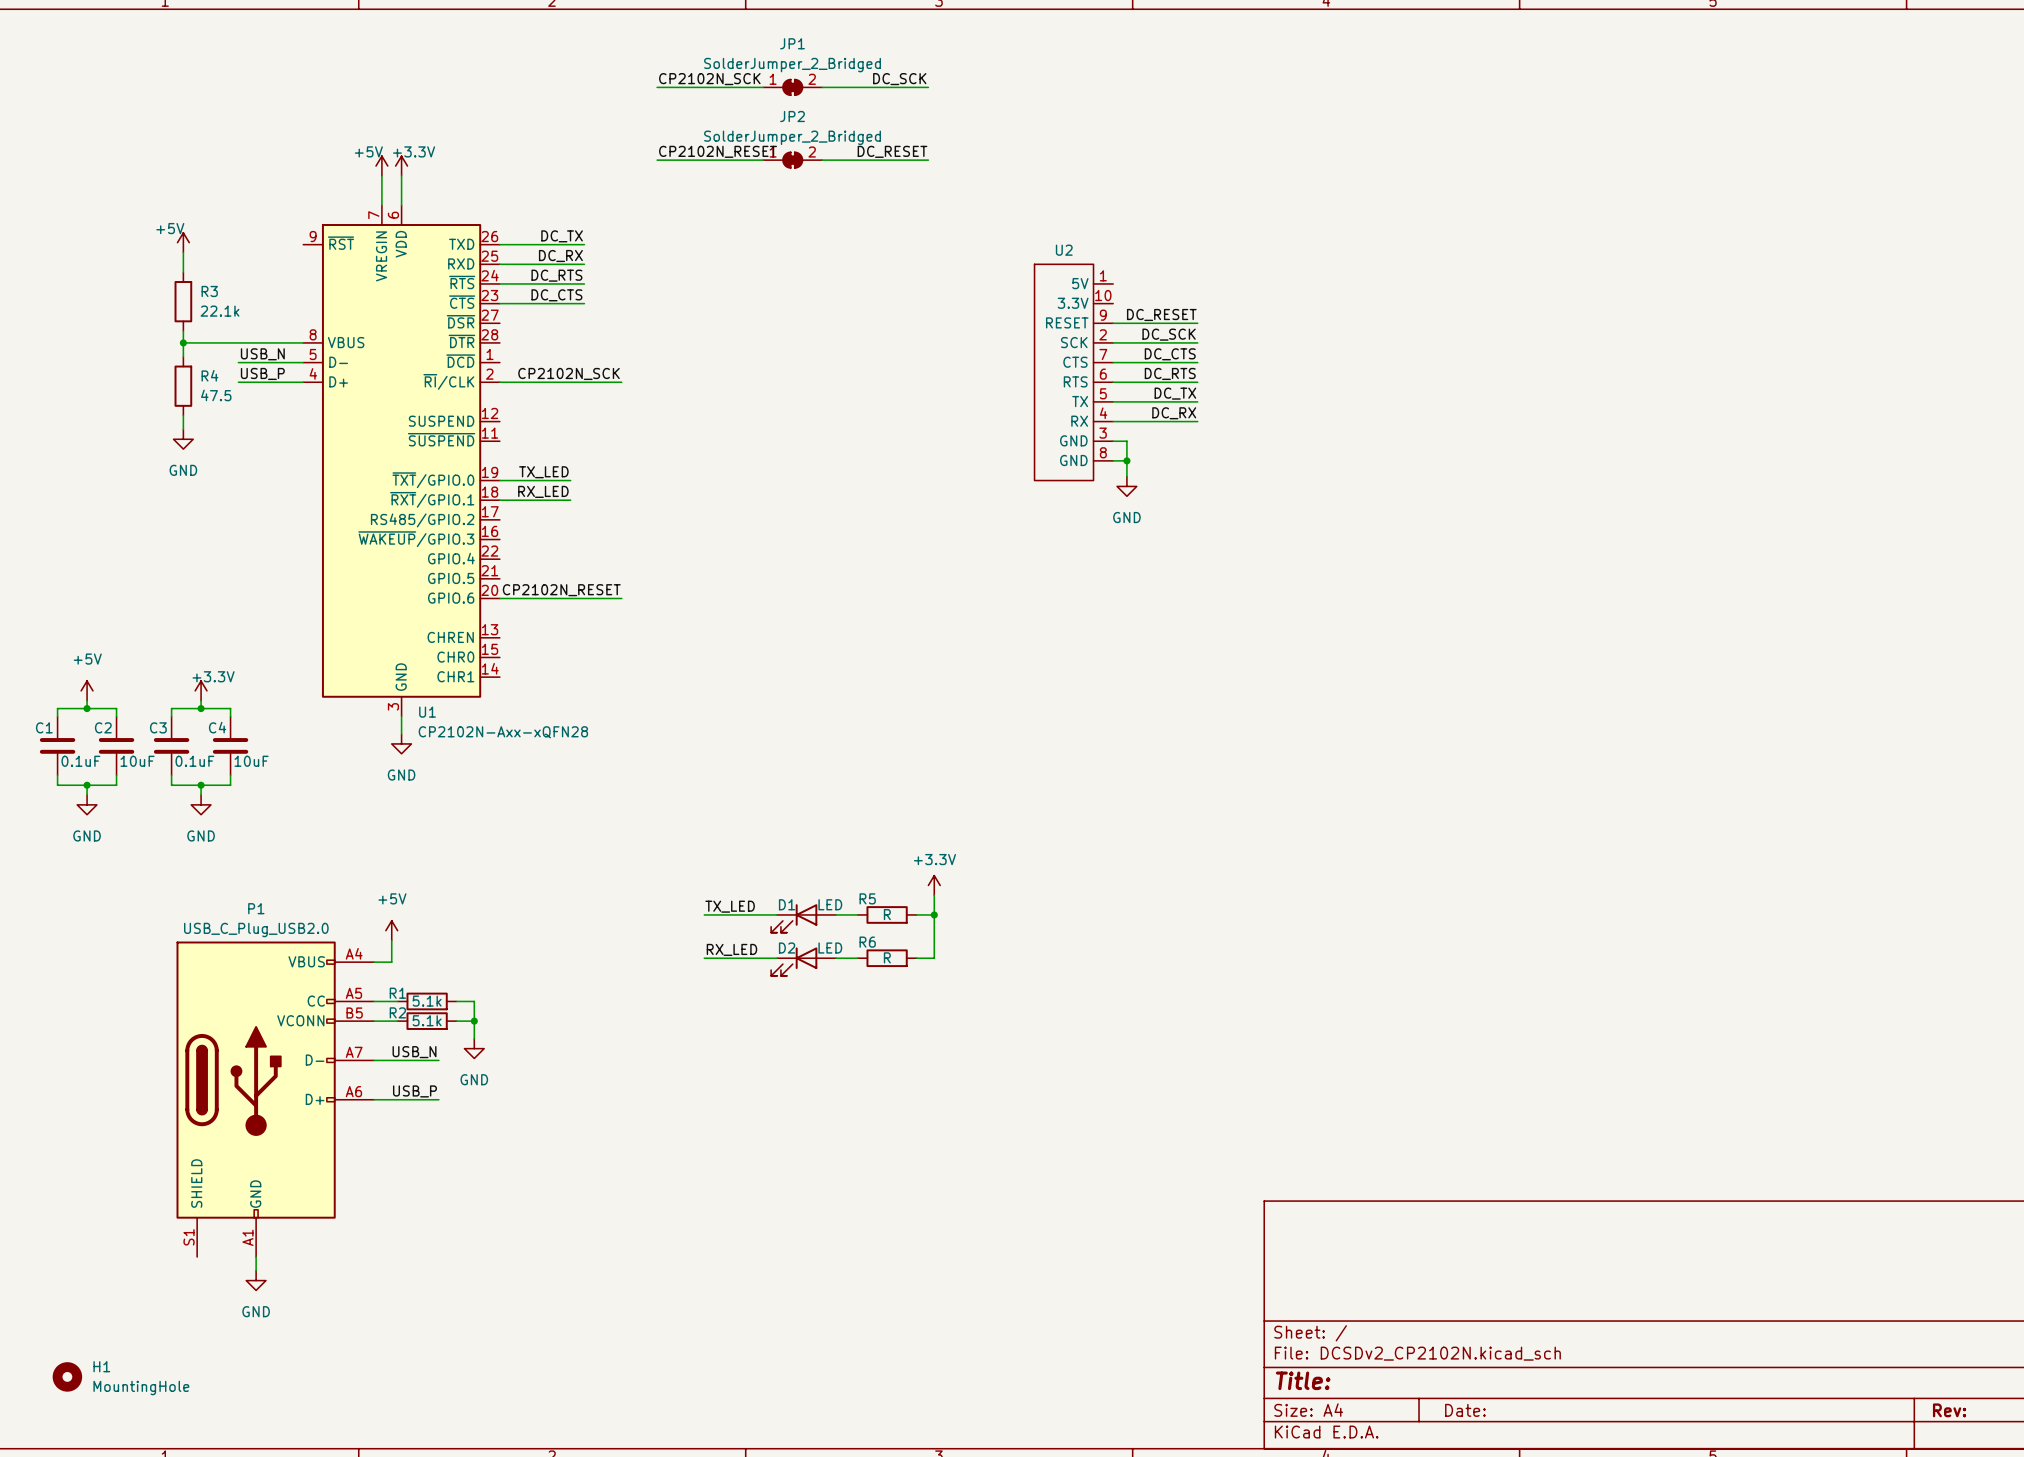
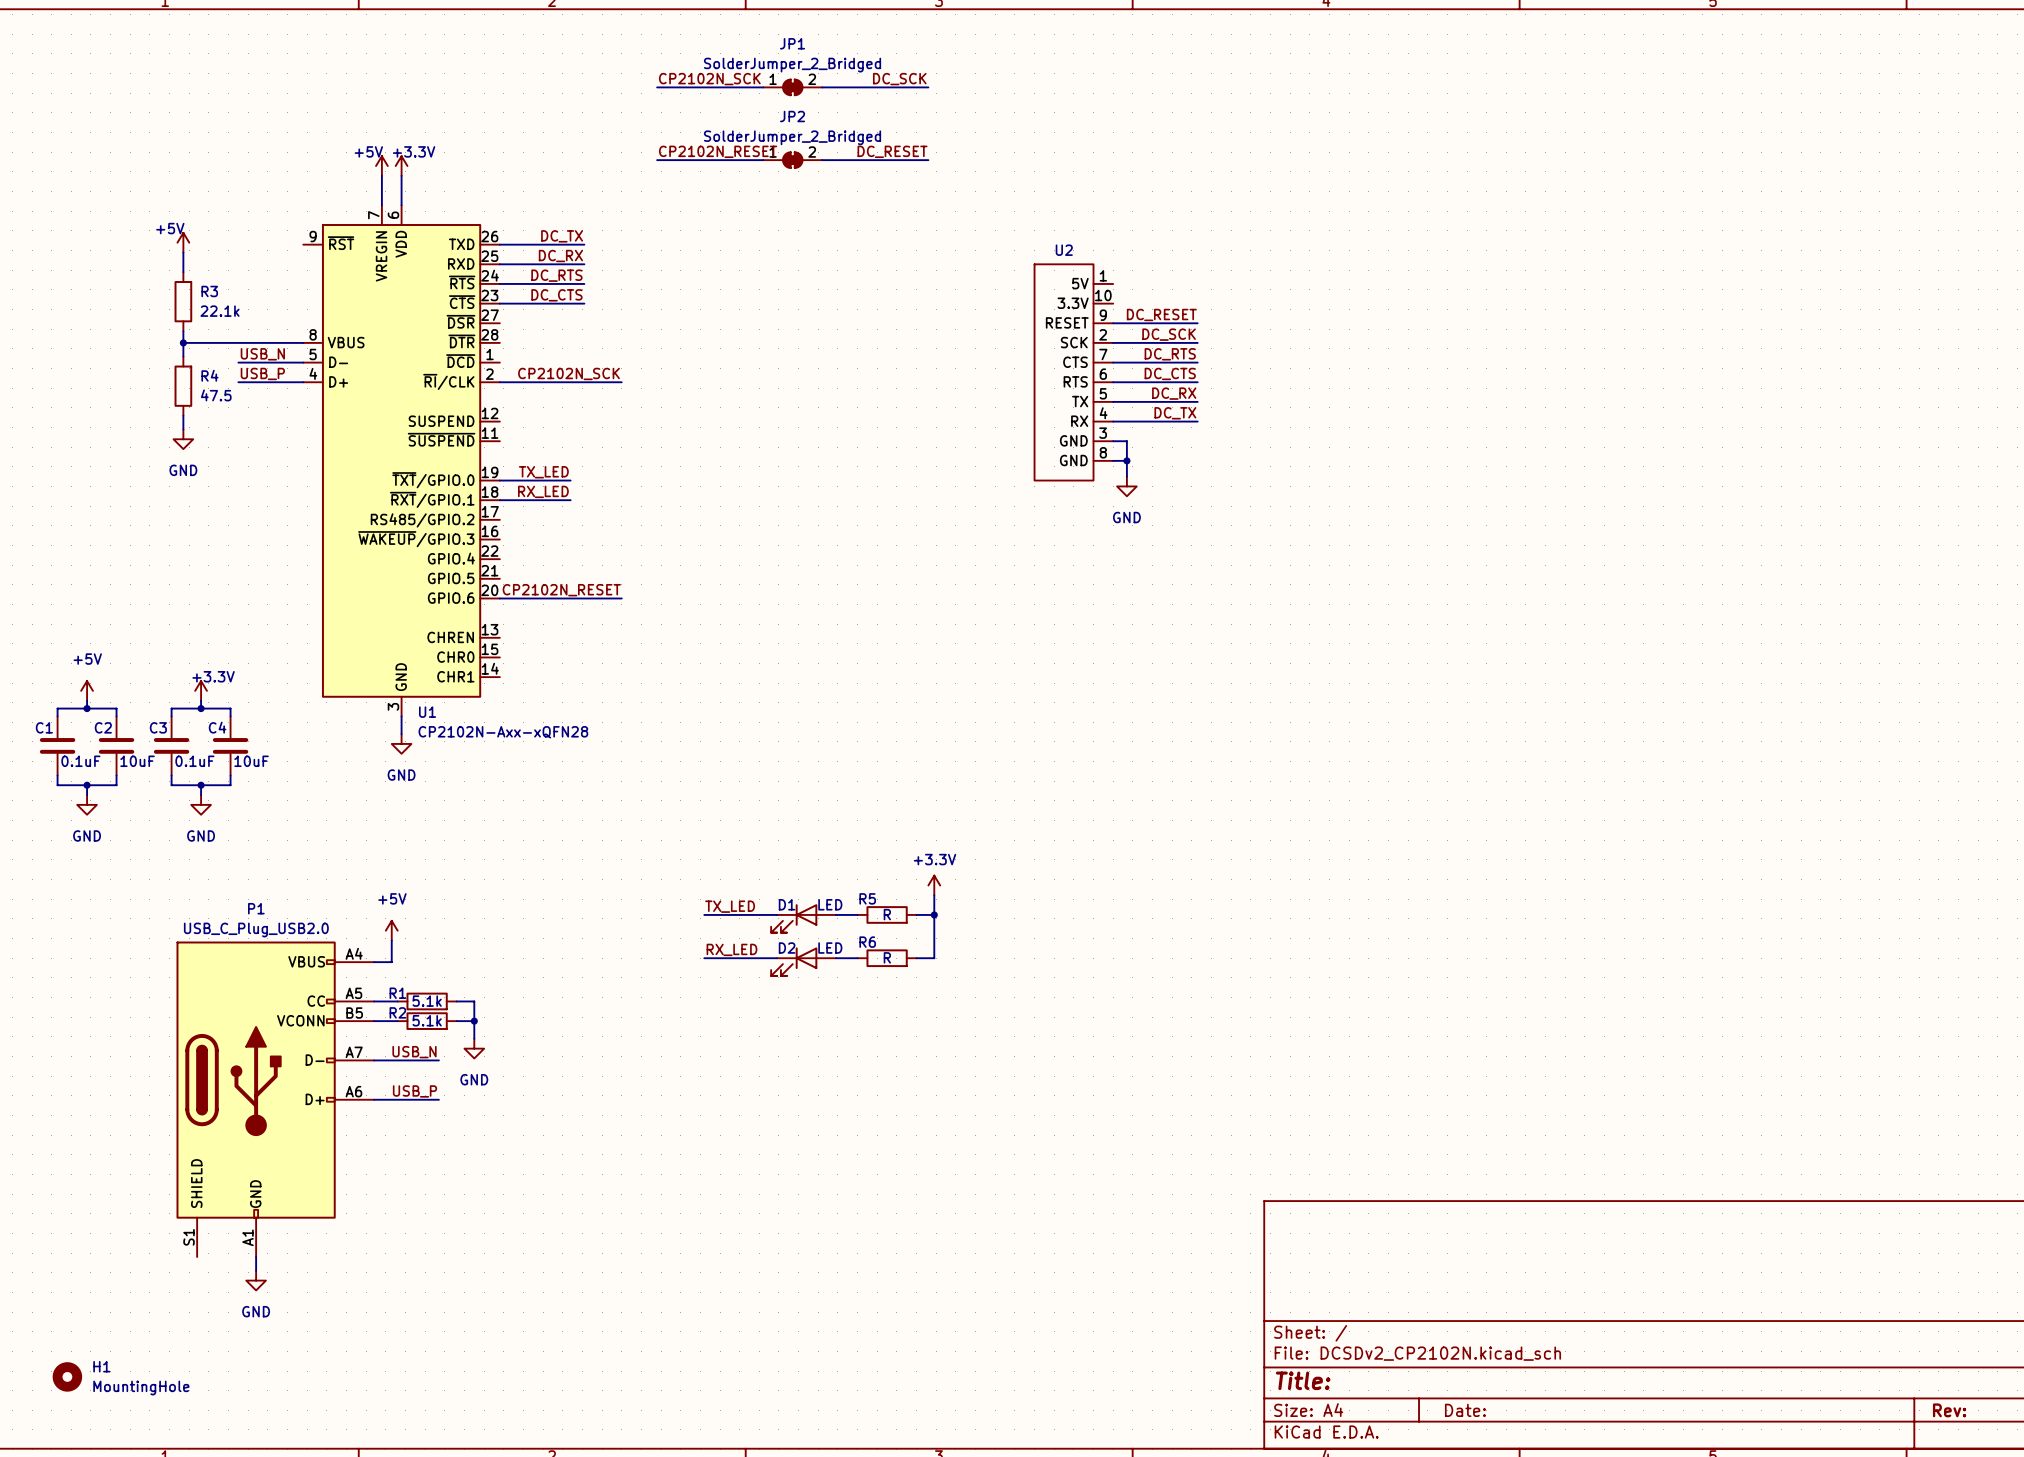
label: DC_CTS (1170, 354) -> DC_RTS (1170, 354)
label: DC_RTS (1170, 373) -> DC_CTS (1170, 373)
label: DC_TX (1175, 393) -> DC_RX (1174, 393)
label: DC_RX (1174, 413) -> DC_TX (1175, 413)

